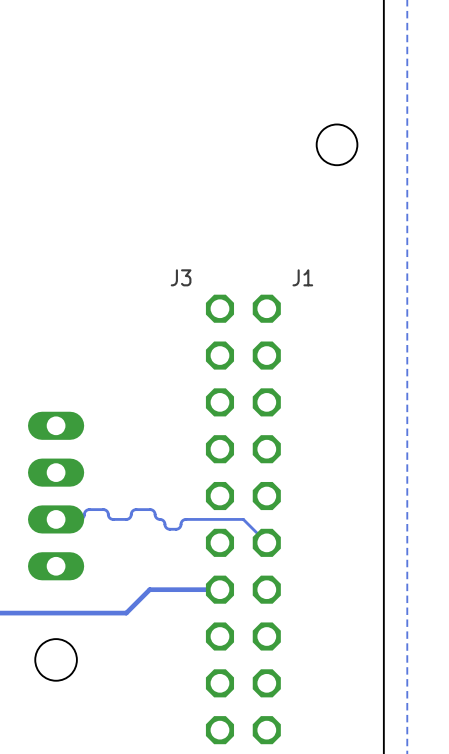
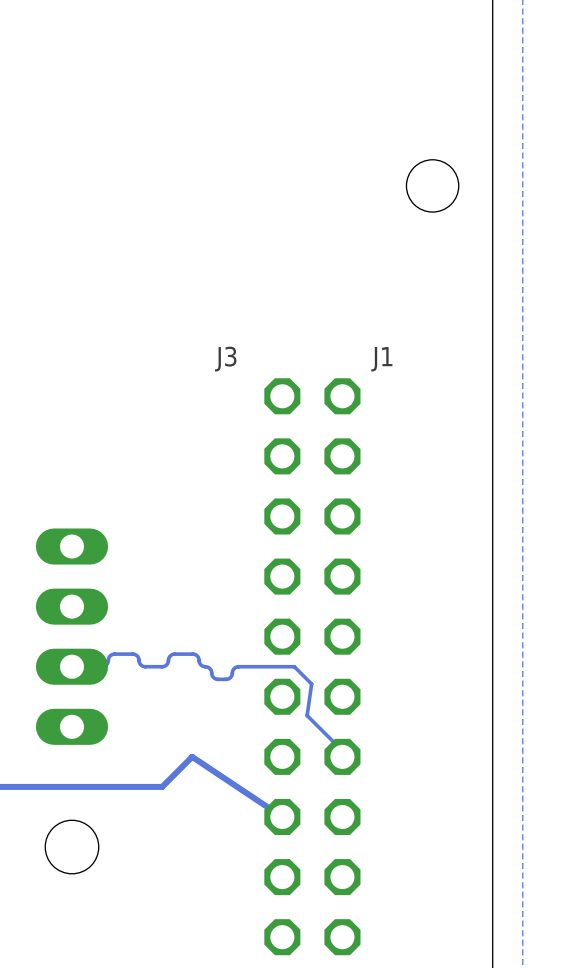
track: (229, 519) (243, 519) (266, 542) -> (294, 666) (311, 684) (307, 715) (342, 750) (342, 756)
track: (219, 589) (149, 589) -> (282, 816) (192, 756)

